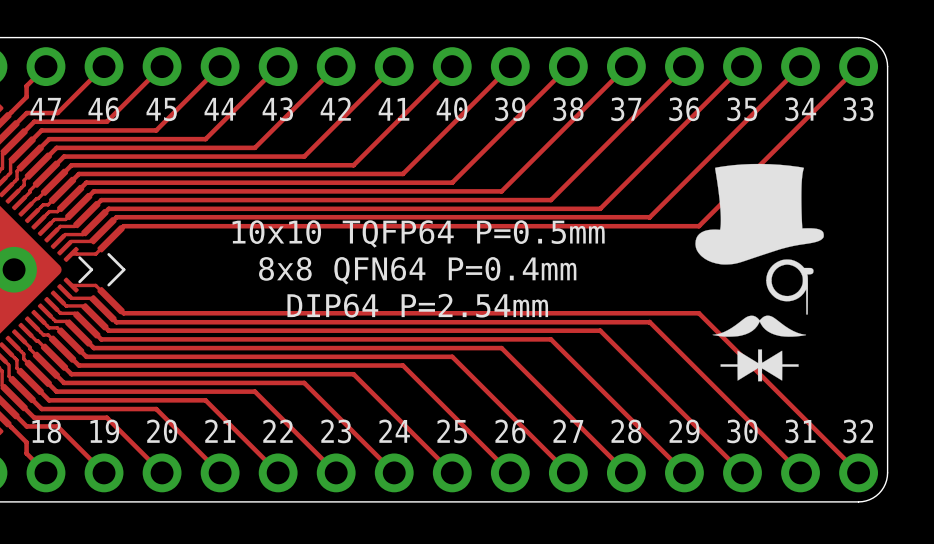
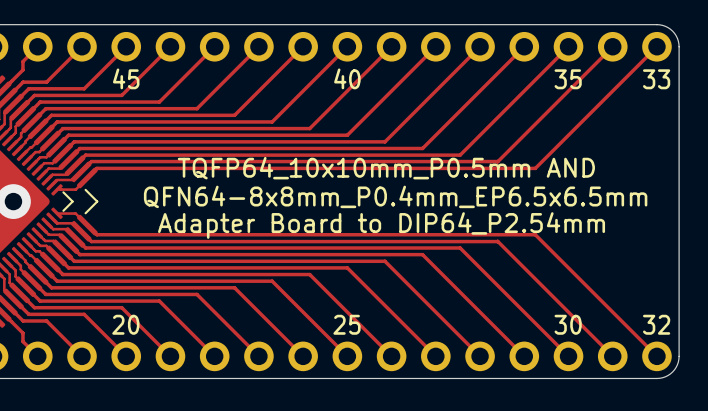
text: 47 (45, 109) -> none
text: 46 (103, 109) -> none
text: 44 (220, 109) -> none
text: 43 (277, 109) -> none
text: 42 (335, 109) -> none
text: 41 (393, 109) -> none
text: 39 (510, 109) -> none
text: 38 (568, 109) -> none
text: 37 (626, 109) -> none
text: 36 (684, 109) -> none
text: 34 (800, 109) -> none
drawing: [695, 163, 824, 382] -> none
text: none -> TQFP64_10x10mm_P0.5mm AND (386, 168)
text: 10x10 TQFP64 P=0.5mm (418, 233) -> none
text: none -> QFN64-8x8mm_P0.4mm_EP6.5x6.5mm (395, 196)
text: 8x8 QFN64 P=0.4mm (417, 270) -> none
text: none -> Adapter Board to DIP64_P2.54mm (381, 225)
text: DIP64 P=2.54mm (417, 305) -> none
text: 18 (46, 431) -> none
text: 19 (104, 431) -> none
text: 21 (220, 431) -> none
text: 22 (278, 431) -> none
text: 23 (336, 431) -> none
text: 24 (394, 431) -> none
text: 26 (510, 431) -> none
text: 27 (568, 431) -> none
text: 28 (626, 431) -> none
text: 29 (684, 431) -> none
text: 31 (800, 431) -> none

